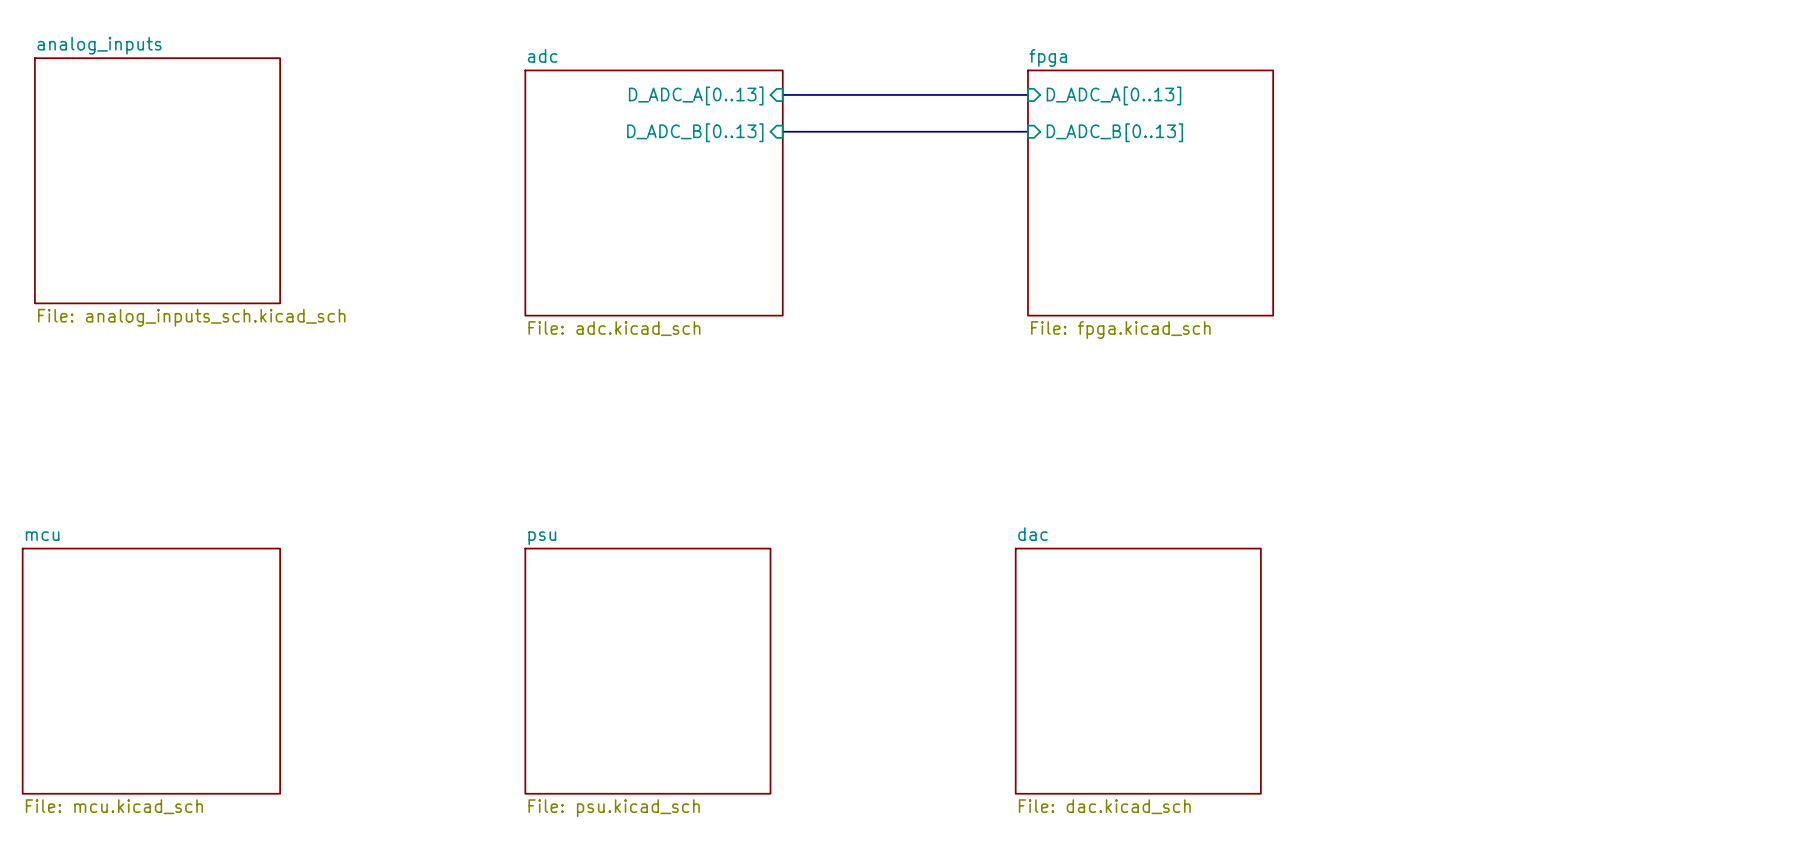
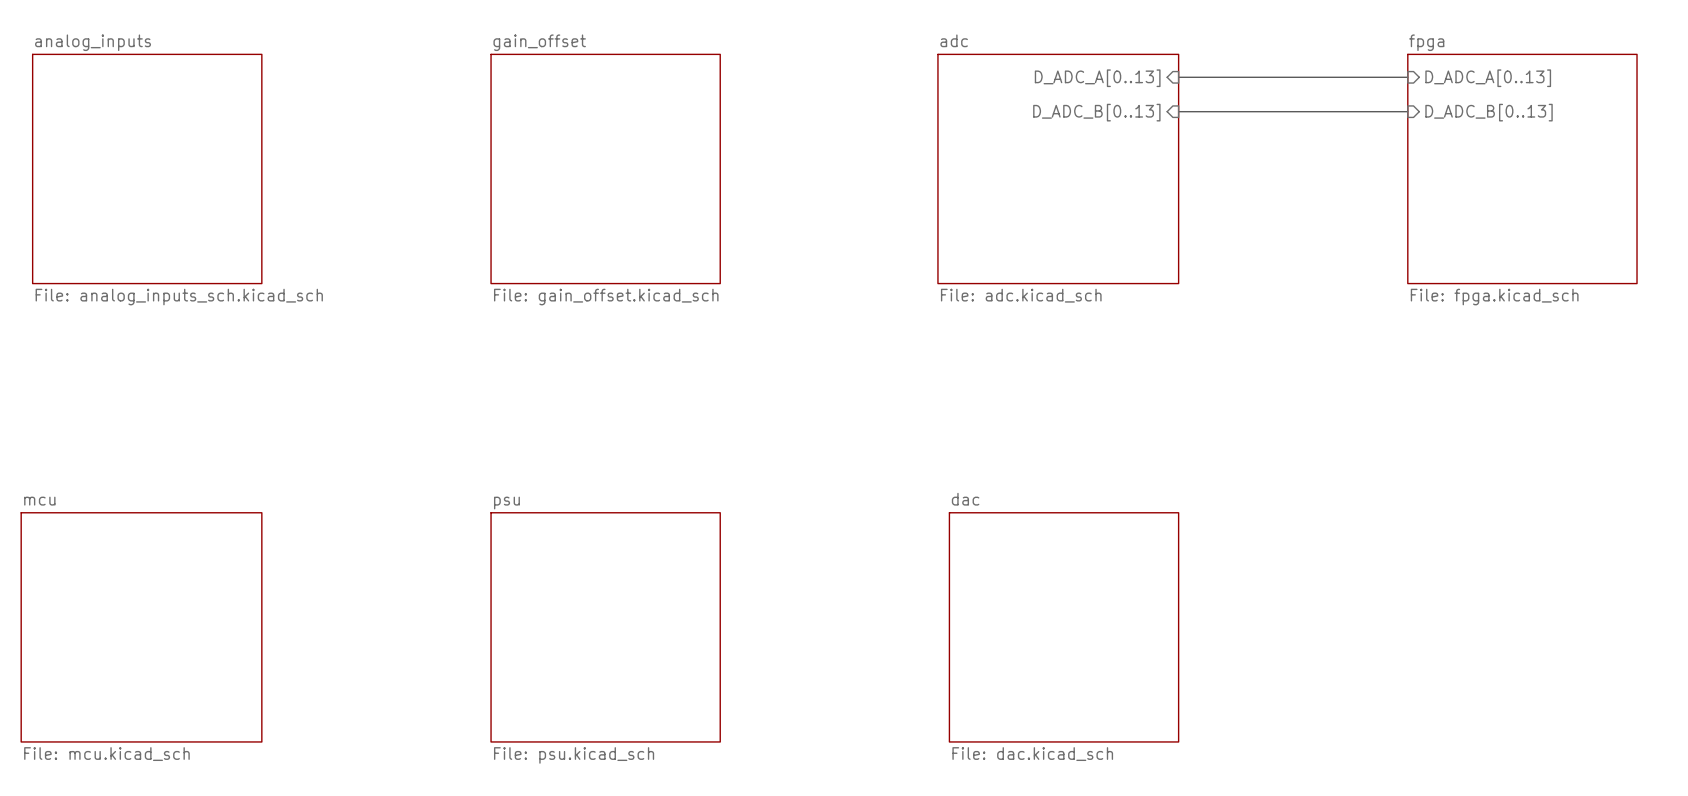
bus: none -> (1178, 77) (1407, 77)
sheet pin: none -> D_ADC_A[0..13] (1488, 78)
bus: (782, 94) (1027, 94) -> none
sheet pin: D_ADC_A[0..13] (696, 95) -> none
sheet pin rotation: 0° (1113, 95) -> 180° (1097, 78)
bus: none -> (1178, 111) (1407, 111)
sheet pin: none -> D_ADC_B[0..13] (1489, 112)
bus: (782, 131) (1027, 131) -> none
sheet pin: D_ADC_B[0..13] (695, 132) -> none
sheet pin rotation: 0° (1114, 132) -> 180° (1096, 112)
sheet gain_offset: none -> File: gain_offset.kicad_sch (605, 168)
sheet adc: none -> File: adc.kicad_sch (1058, 168)
sheet fpga: none -> File: fpga.kicad_sch (1522, 168)
sheet adc: File: adc.kicad_sch (654, 193) -> none
sheet fpga: File: fpga.kicad_sch (1150, 193) -> none

